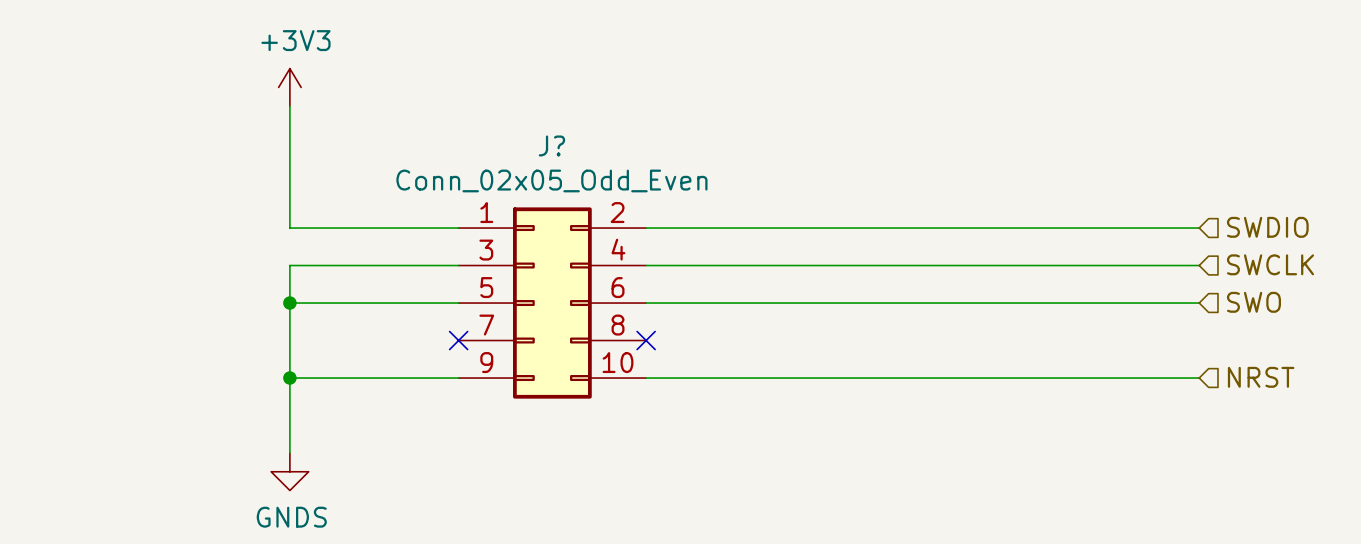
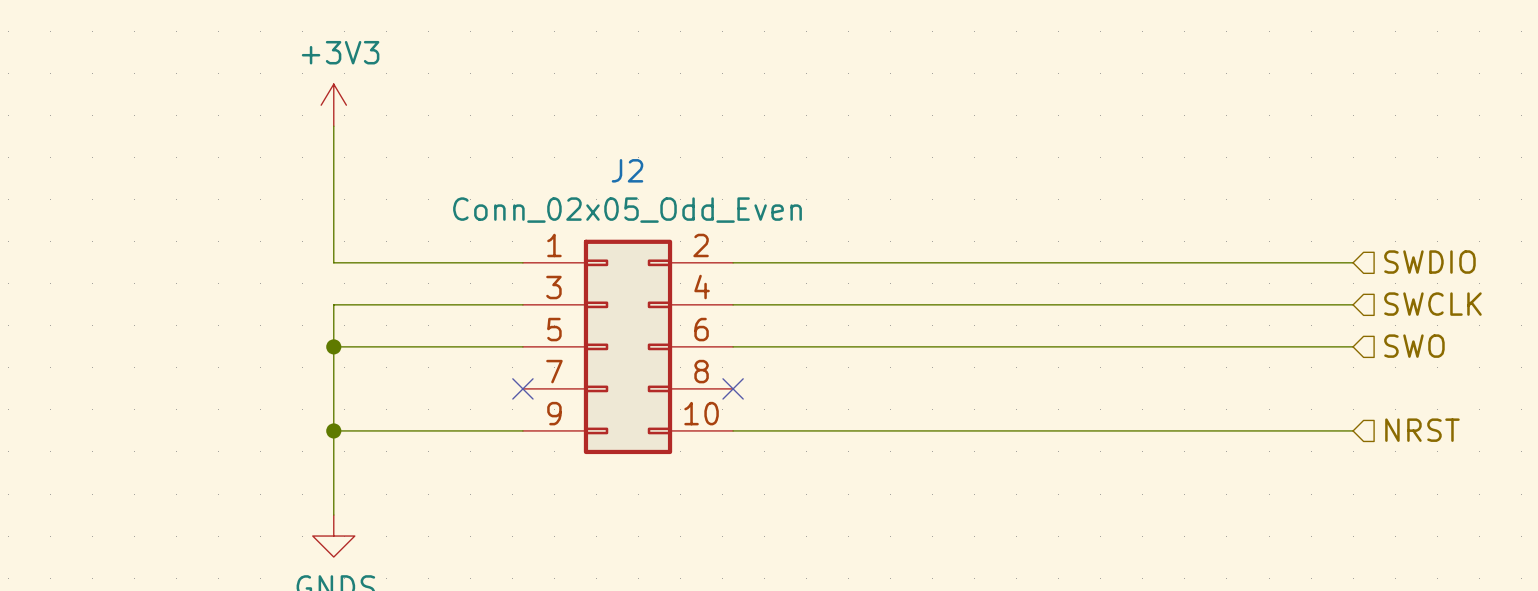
J? name: J? (551, 145) -> J2 (627, 170)

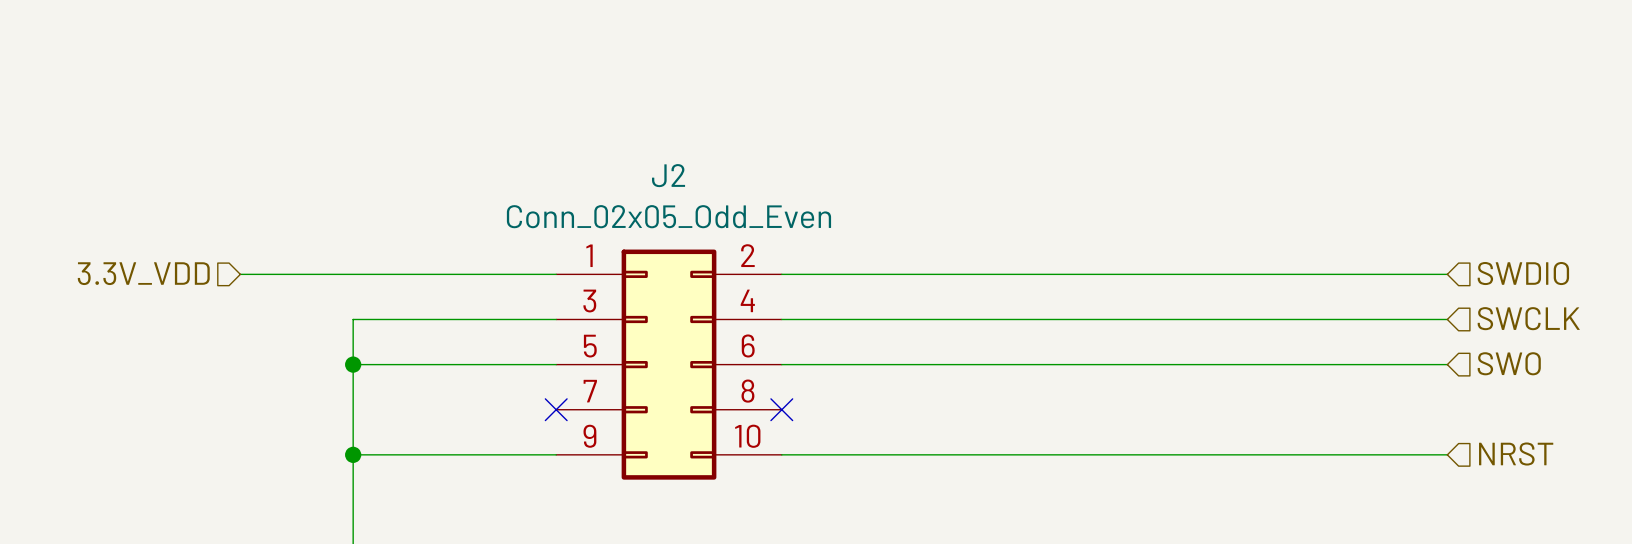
power symbol: +3V3 (333, 105) -> none
wire: (333, 126) (333, 262) -> (240, 274) (353, 274)
hierarchical label: none -> 3.3V_VDD (143, 273)

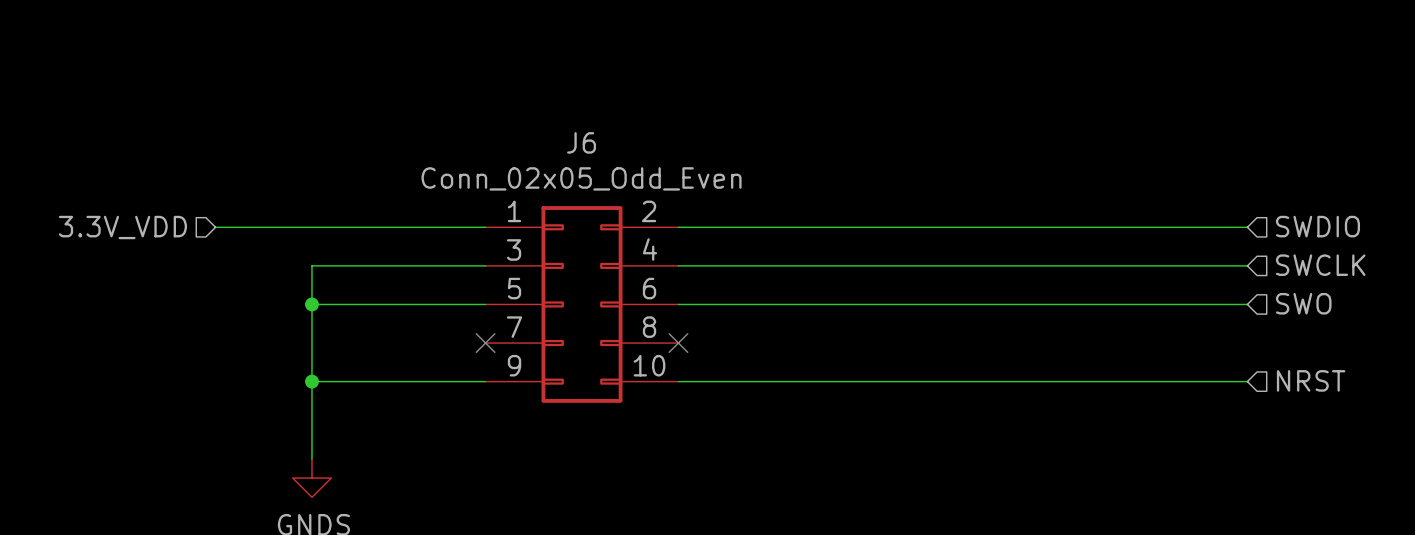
J2 name: J2 (668, 175) -> J6 (581, 142)

